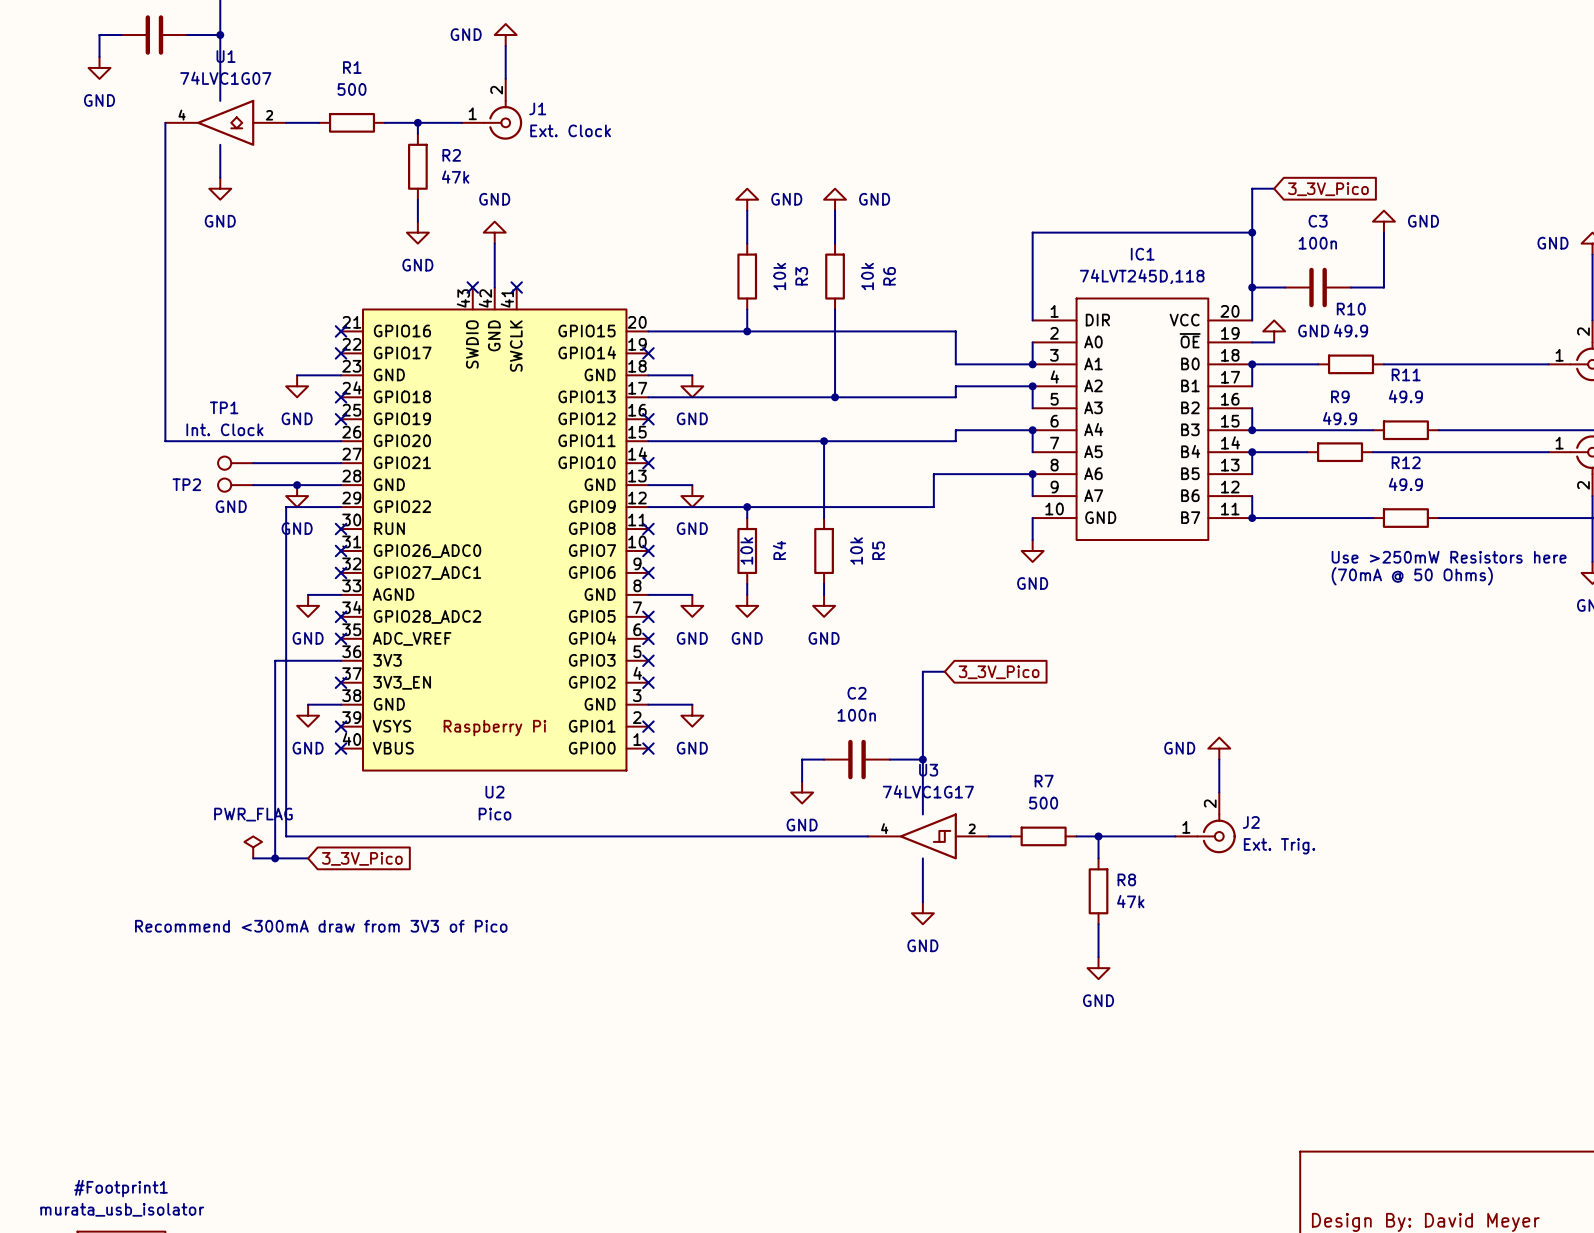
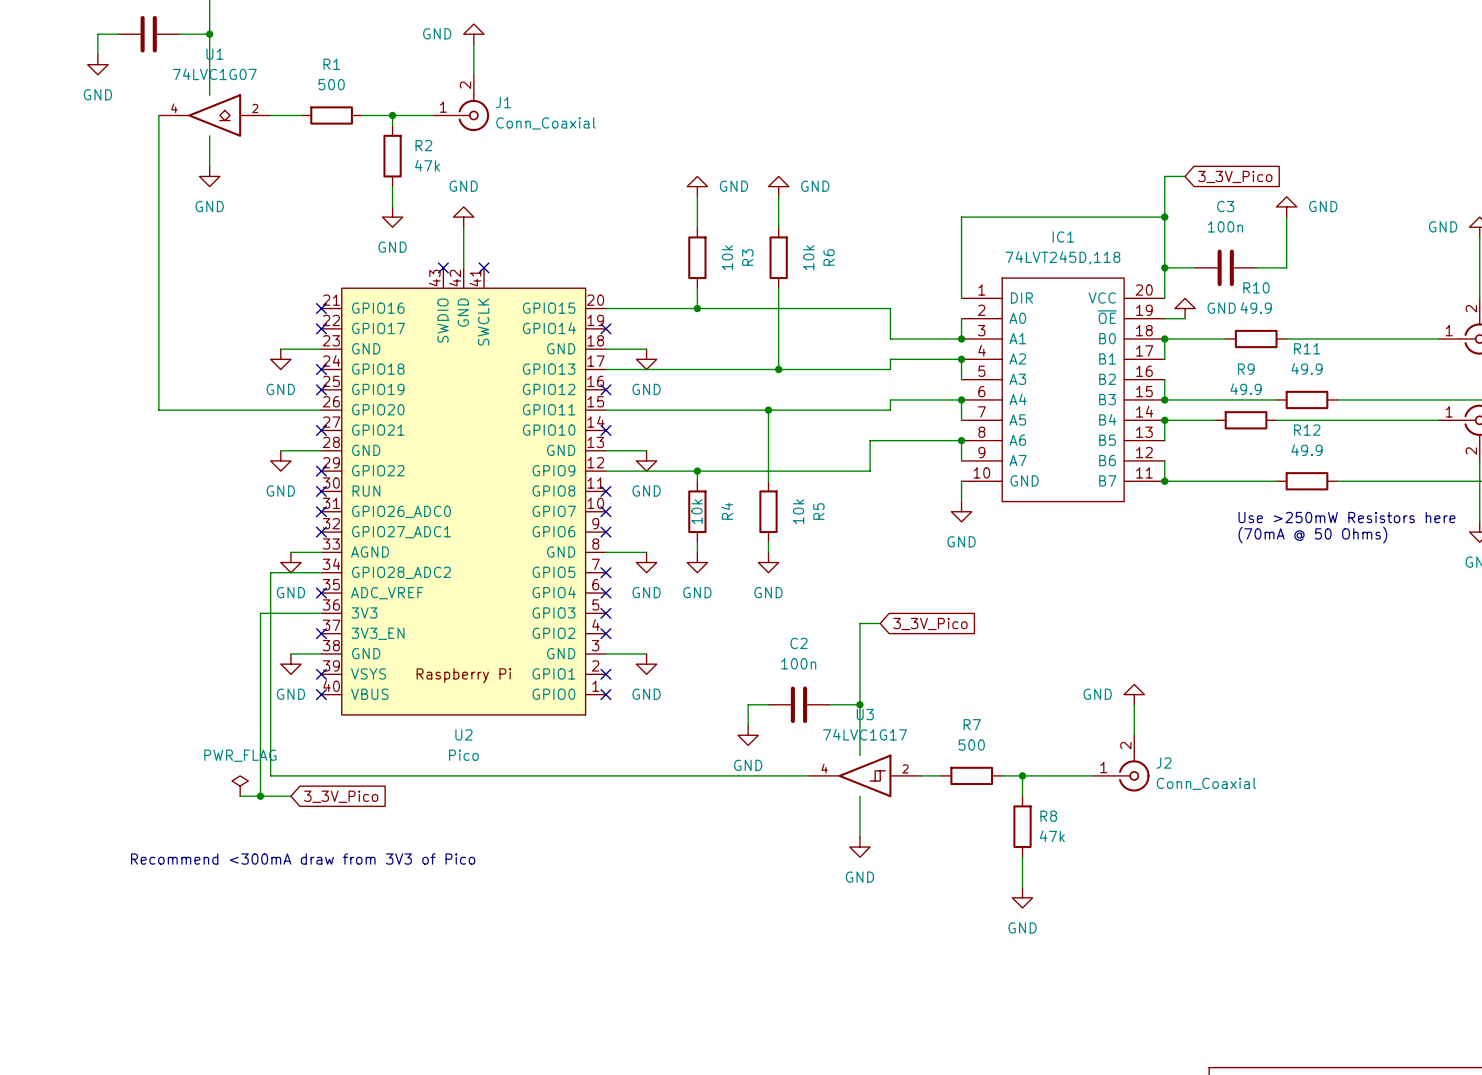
J1 value: Ext. Clock (570, 130) -> Conn_Coaxial (546, 123)
TP1: Int. Clock (235, 463) -> none
wire: (253, 463) (341, 463) -> none
no-connect mark: none -> (321, 430)
TP2: GND (235, 485) -> none
wire: (253, 485) (297, 485) -> none
junction: (297, 485) -> none
wire: (341, 507) (286, 507) (286, 616) -> (321, 572) (270, 572)
no-connect mark: none -> (321, 471)
no-connect mark: (341, 616) -> none
J2 value: Ext. Trig. (1279, 846) -> Conn_Coaxial (1206, 783)

